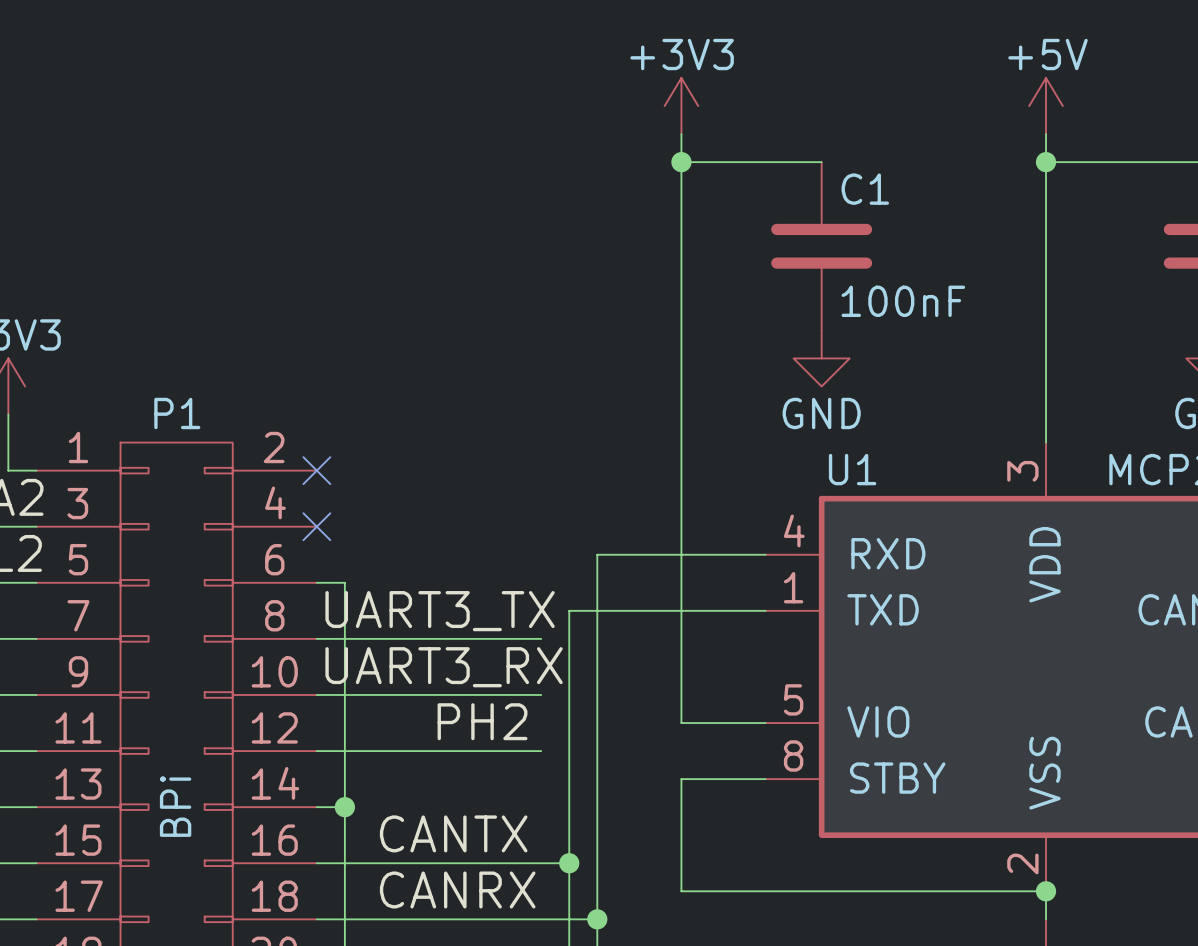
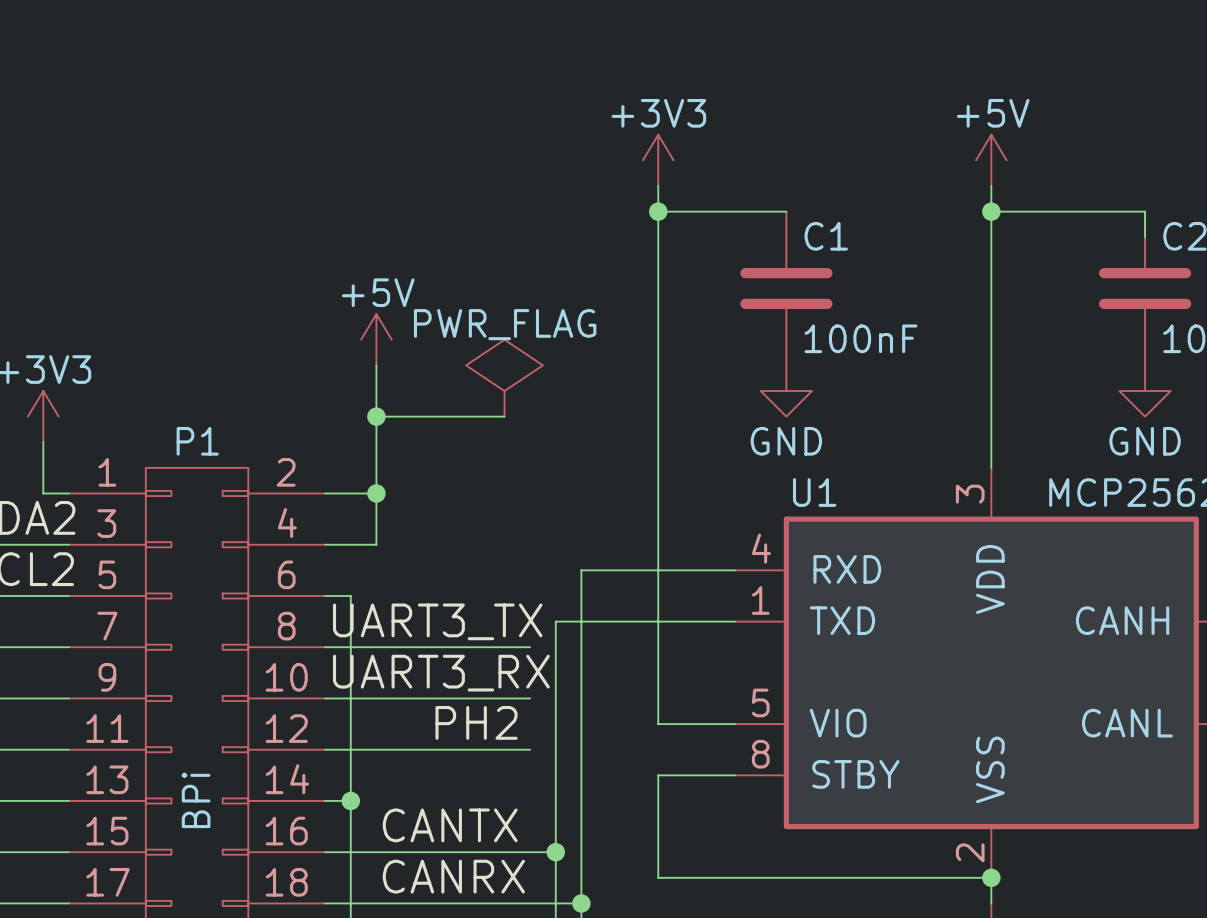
power symbol: none -> +5V (376, 339)
wire: none -> (376, 365) (376, 544) (325, 544)
power symbol: none -> PWR_FLAG (504, 378)
wire: none -> (376, 416) (504, 416)
junction: none -> (376, 416)
wire: none -> (325, 493) (376, 493)
no-connect mark: (316, 470) -> none
junction: none -> (376, 493)
no-connect mark: (316, 526) -> none

